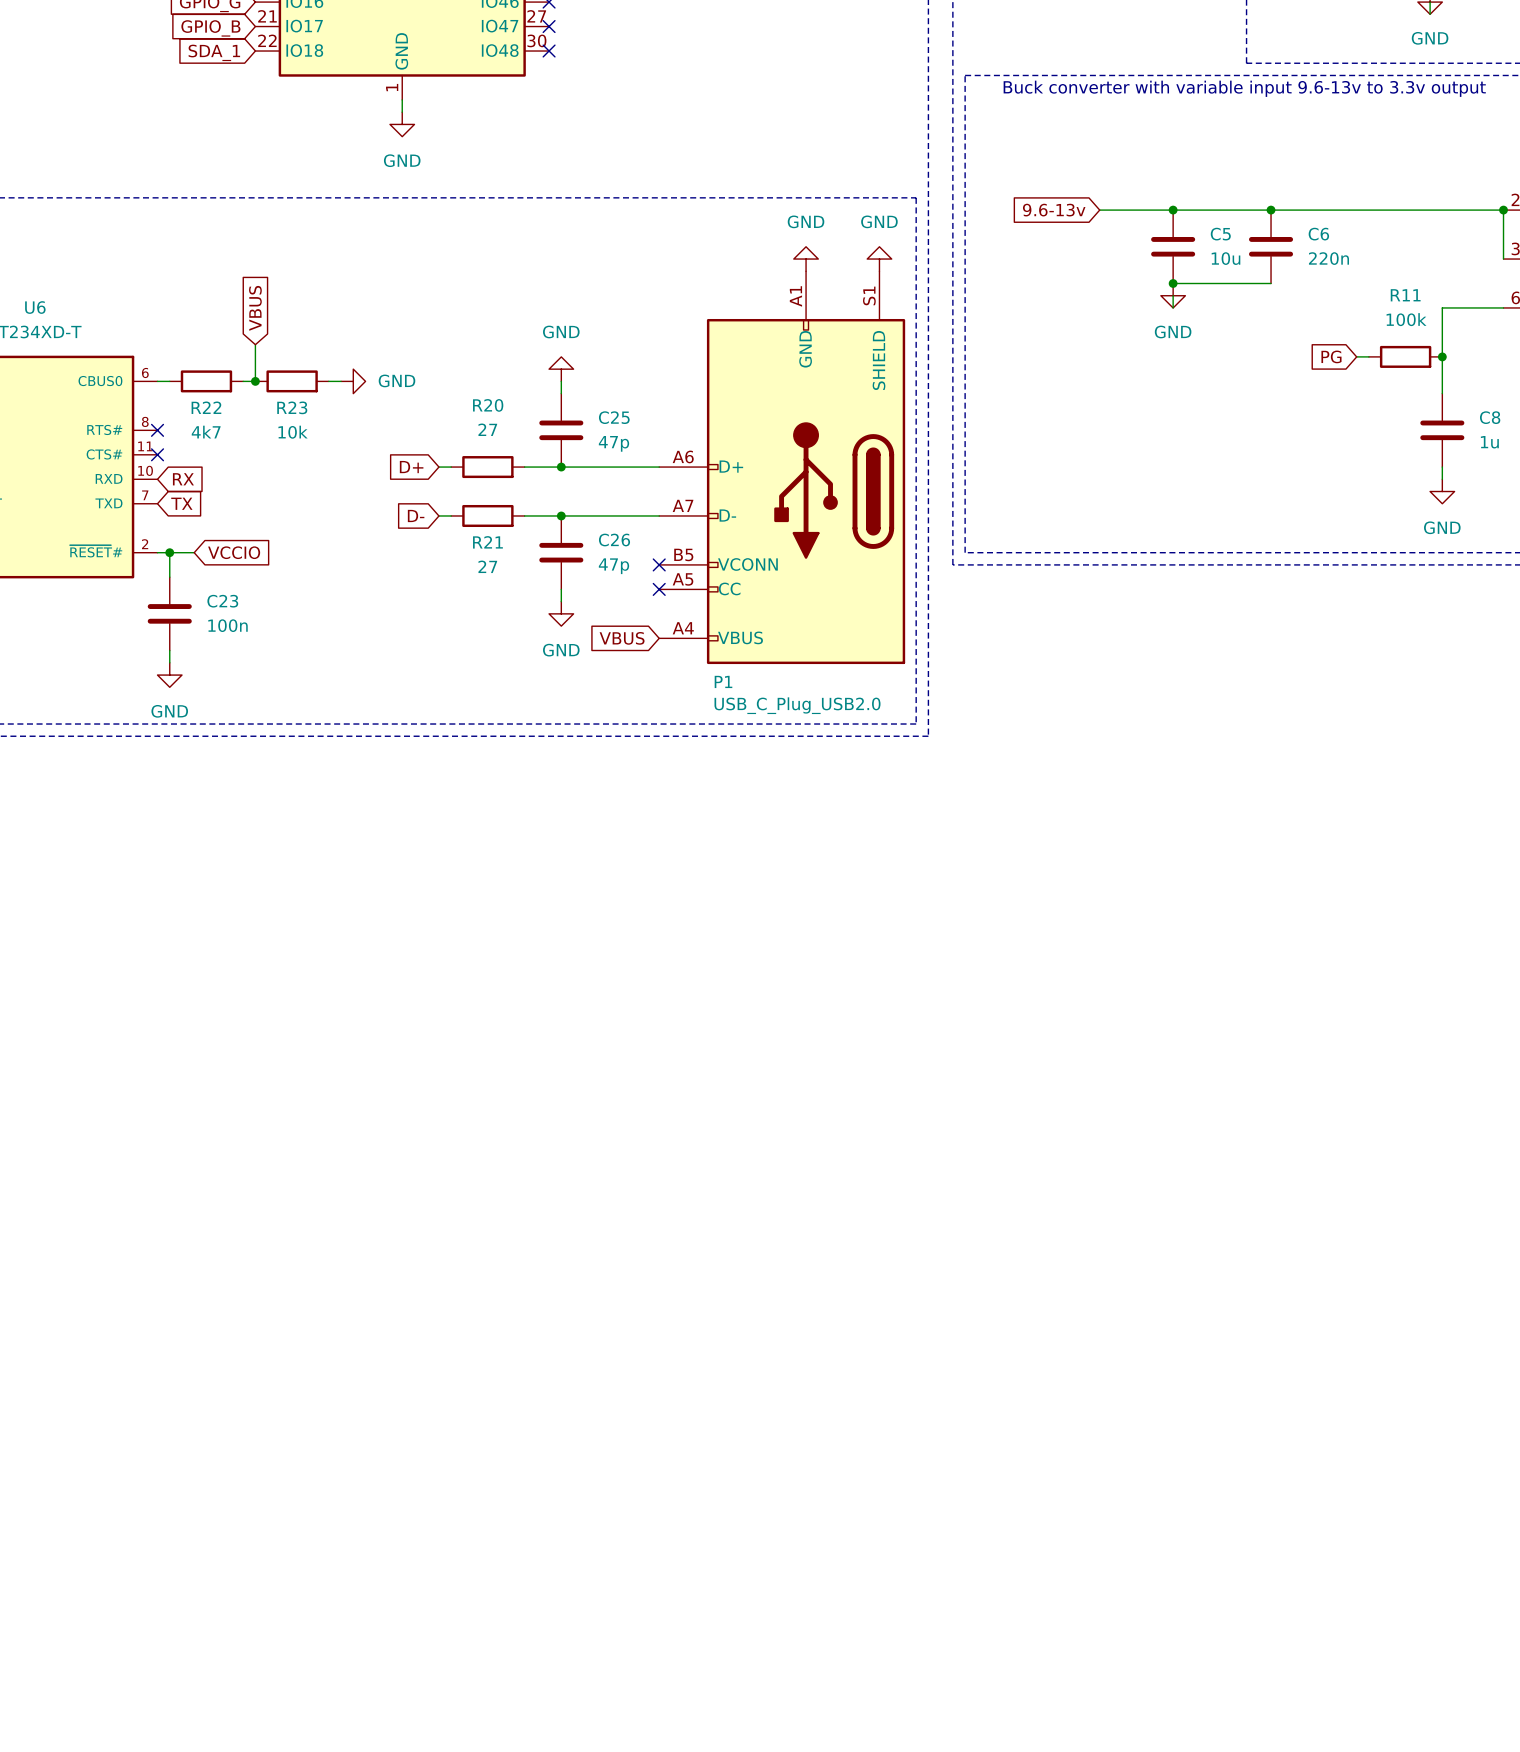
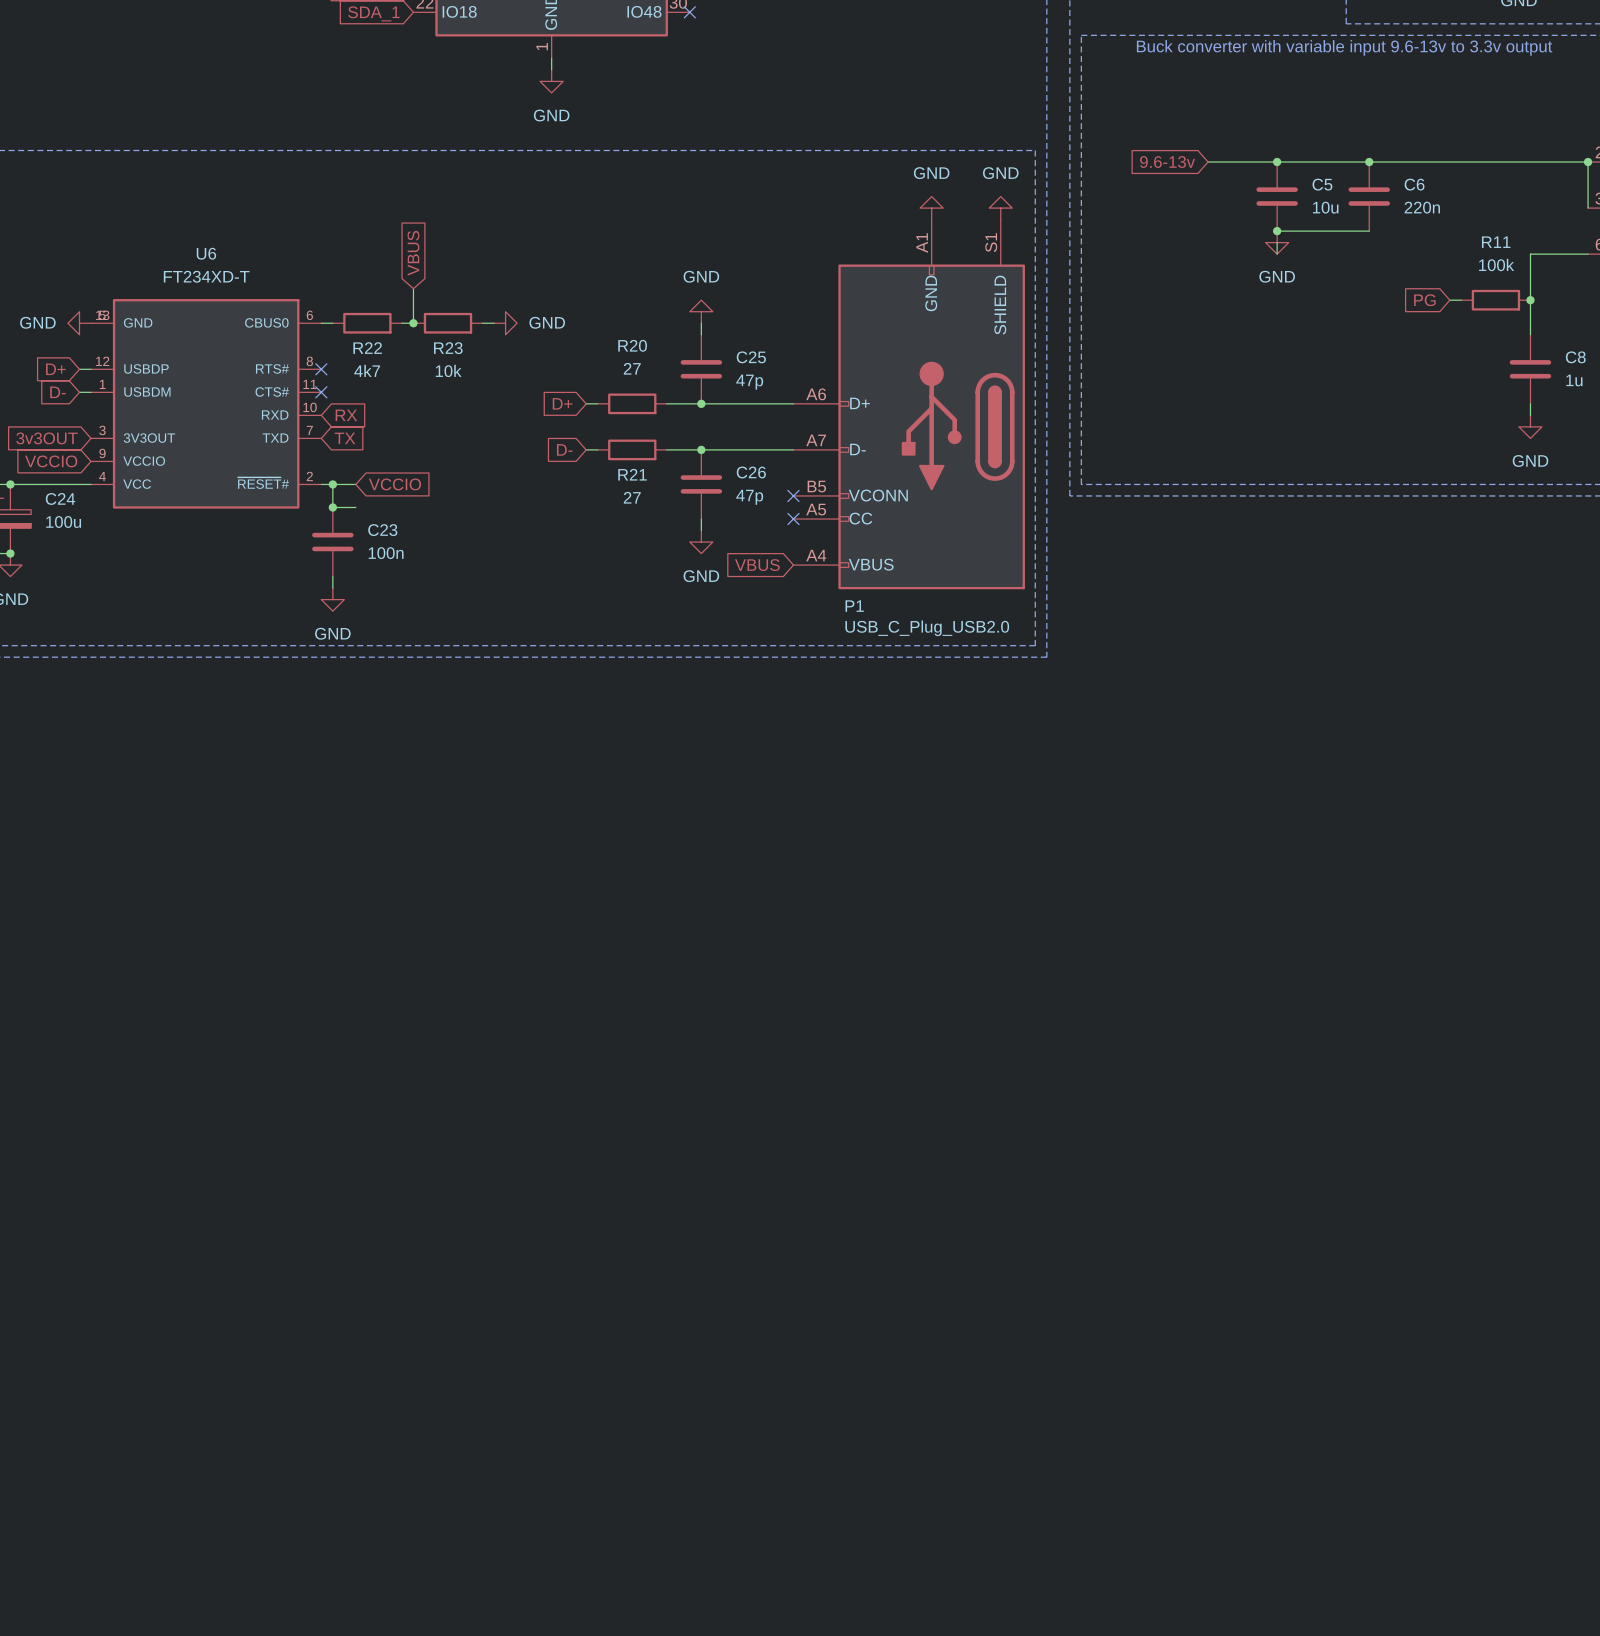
wire: none -> (332, 507) (355, 507)
junction: none -> (332, 507)

